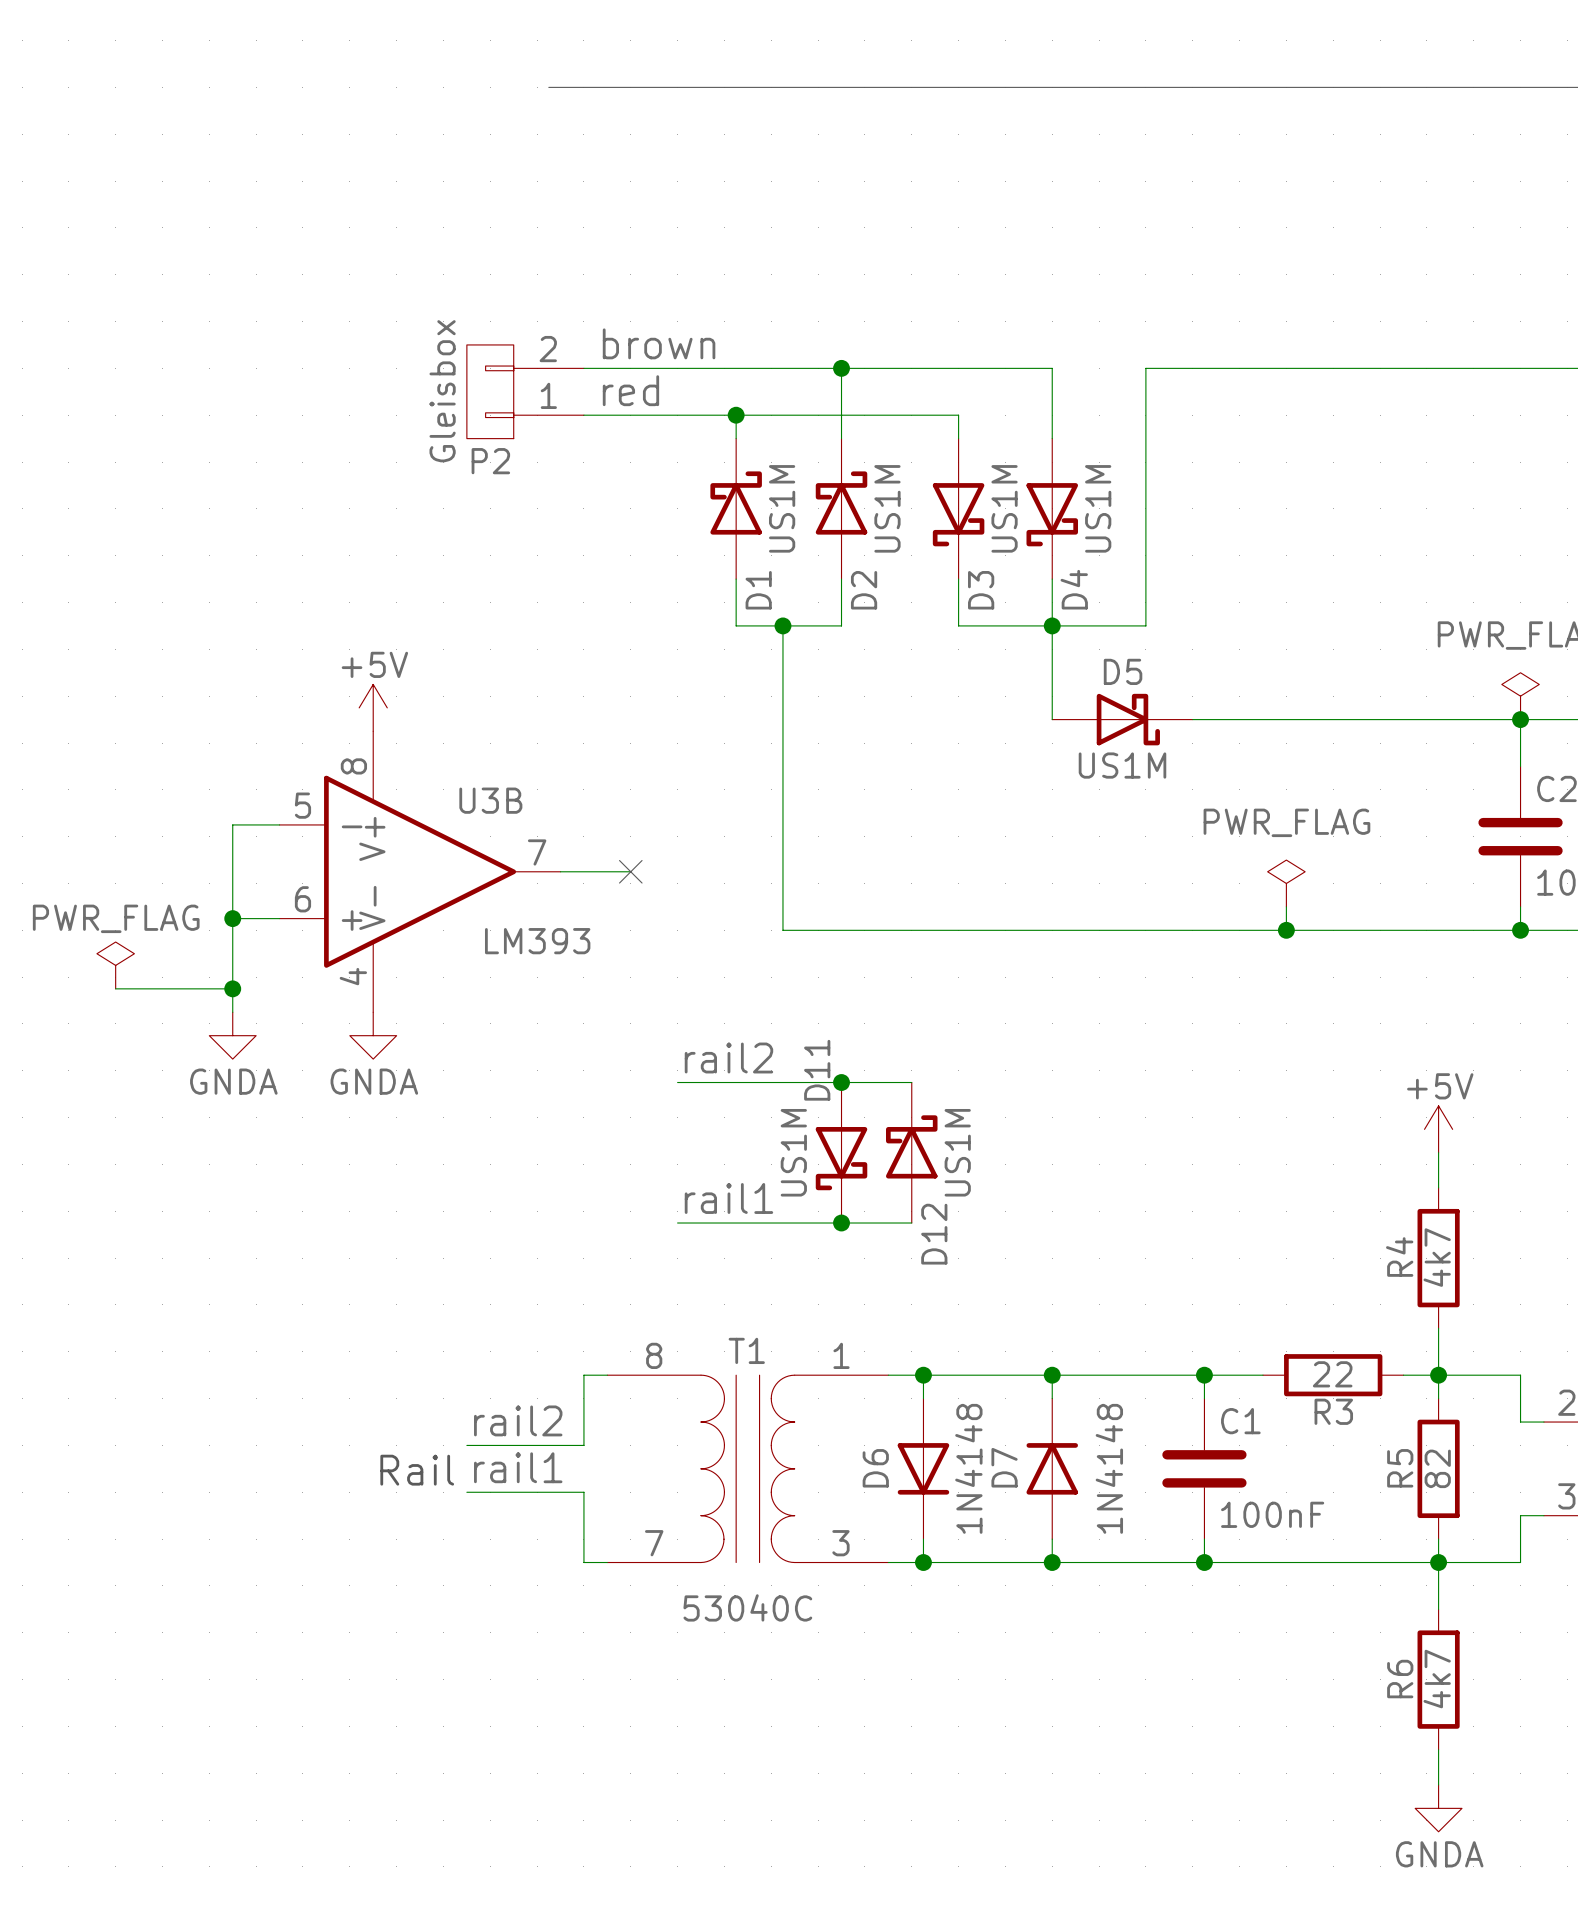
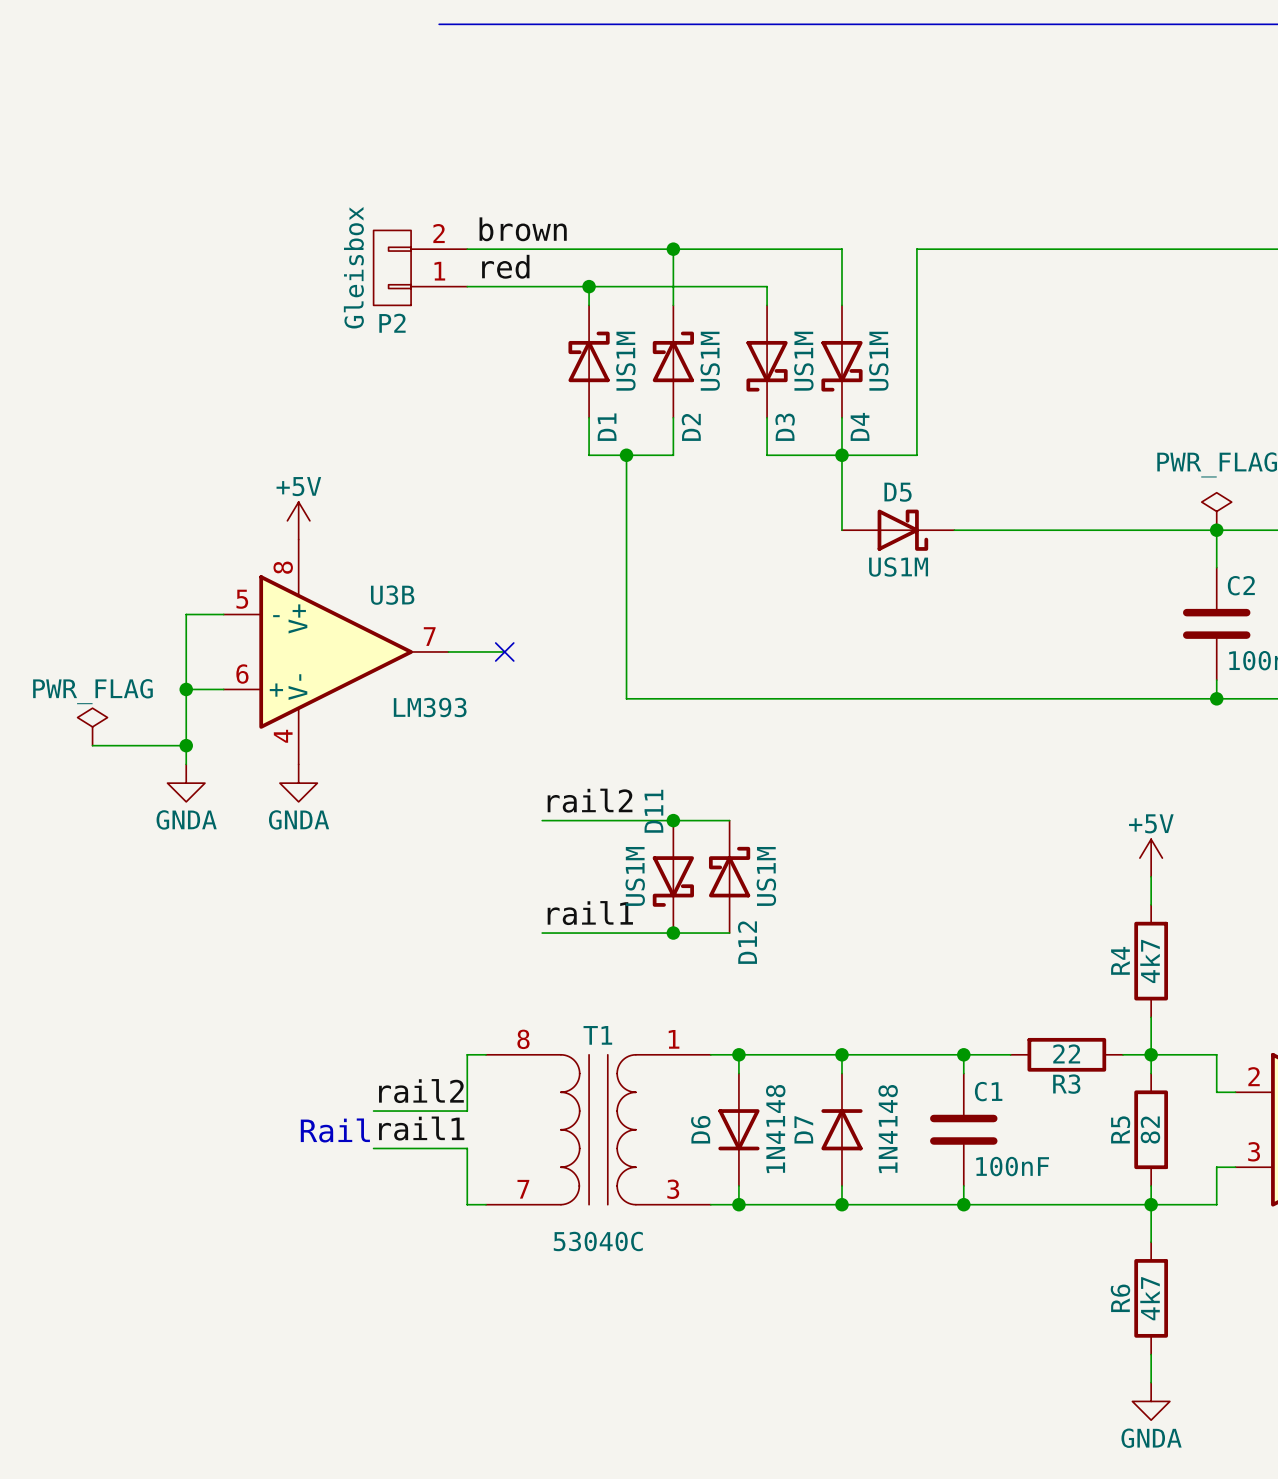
power symbol: PWR_FLAG (1286, 883) -> none
wire: (1286, 906) (1286, 930) -> none
junction: (1286, 930) -> none

